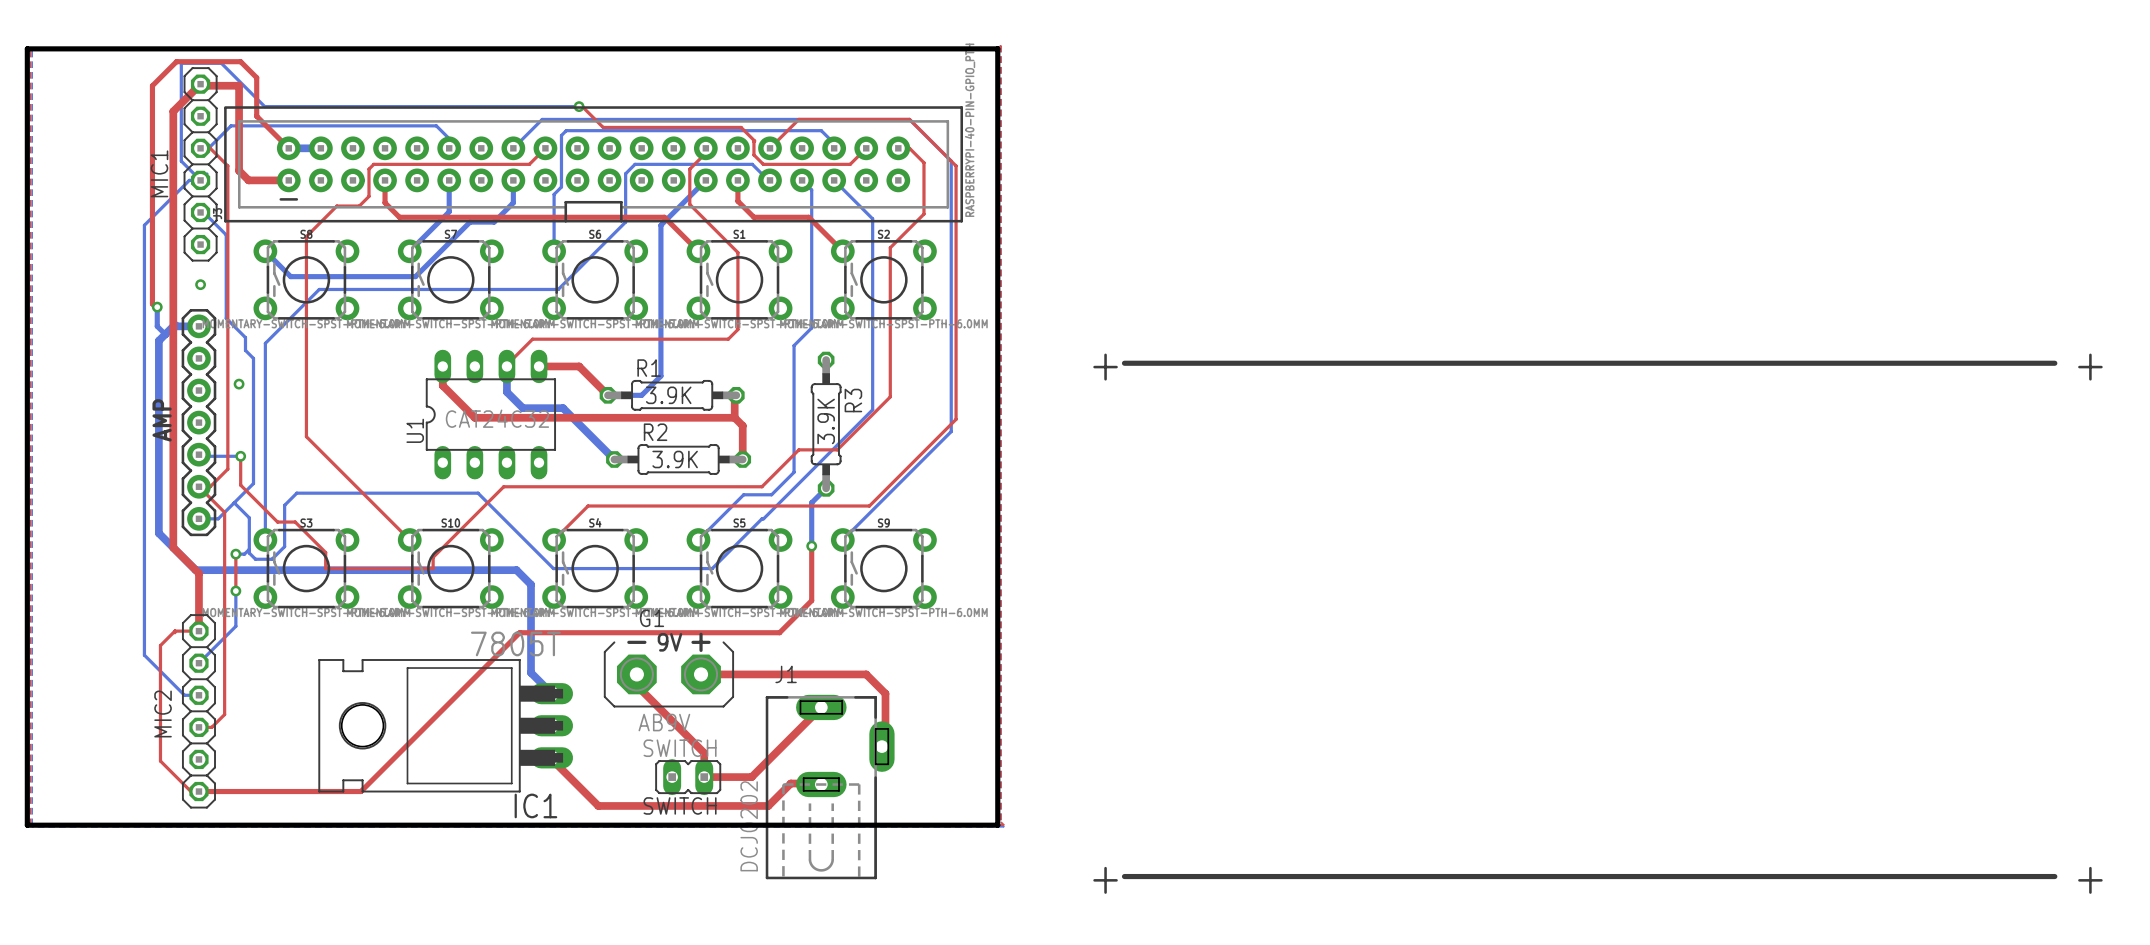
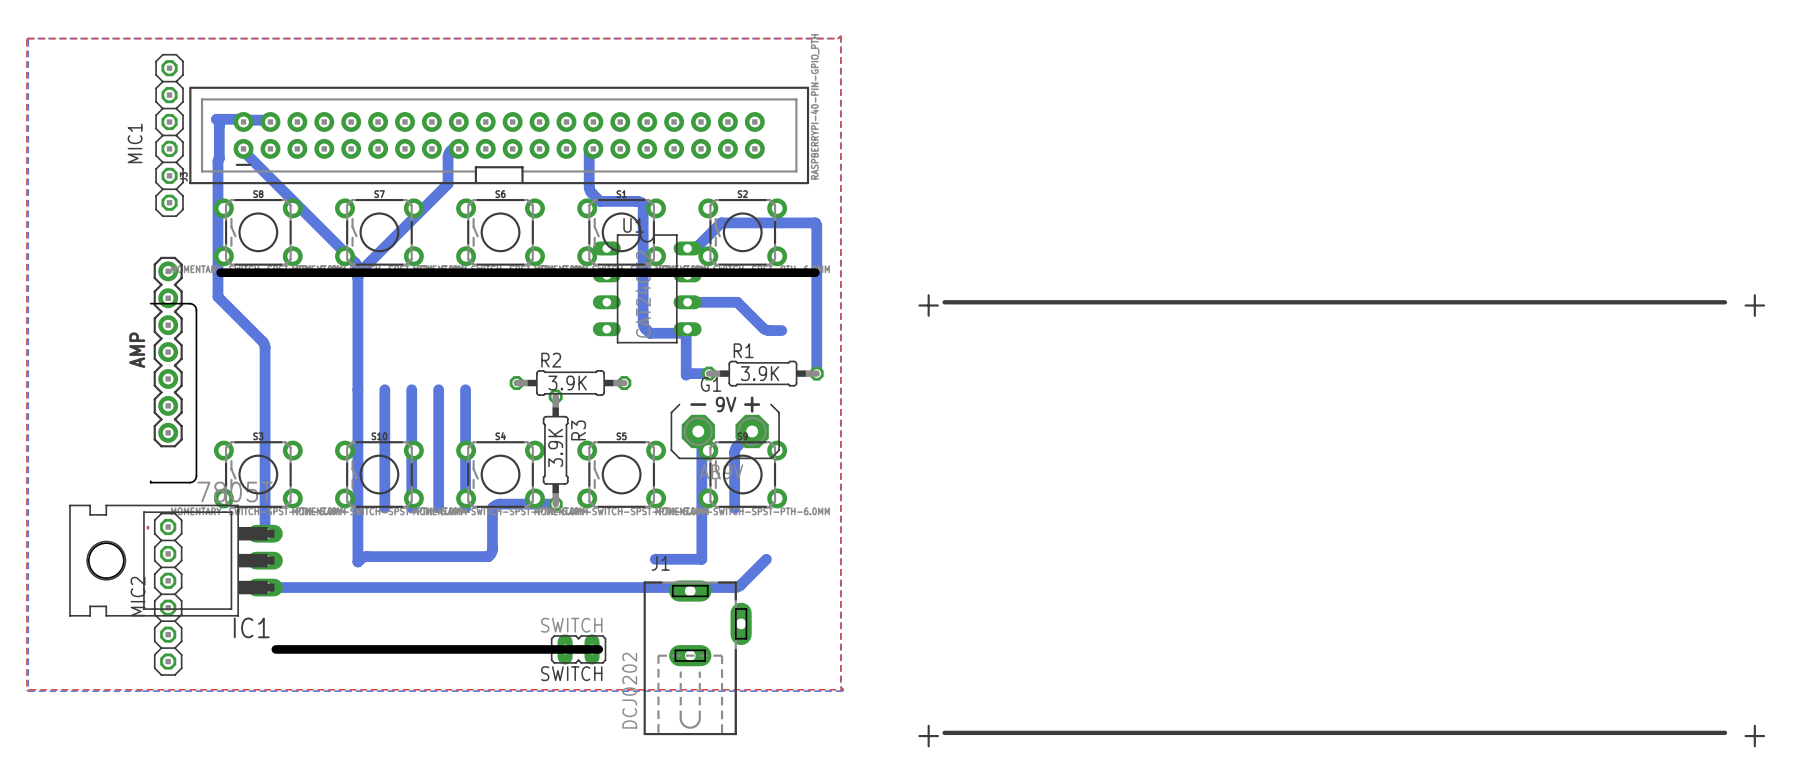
board edge: (27, 48) (997, 48) (997, 825) (27, 825) (27, 48) -> none
bottom track: (579, 106) (264, 106) (221, 63) (181, 63) (181, 161) (200, 180) (189, 180) (144, 225) (144, 655) (184, 695) (198, 695) (194, 700) -> none
top track: (579, 106) (582, 106) (603, 127) (741, 127) (754, 140) (753, 154) (763, 164) (850, 164) (866, 148) -> none
via: (579, 106) -> none
bottom track: none -> (266, 120) (216, 119) (219, 125) (217, 296) (262, 341) (265, 346) (265, 533)
bottom track: (200, 148) (208, 148) (231, 125) (436, 125) (449, 138) (449, 148) -> none
top track: (200, 148) (210, 148) (227, 165) (227, 469) (210, 486) (198, 486) (224, 512) (224, 714) (211, 727) (198, 727) -> none
top track: (288, 148) (256, 116) (256, 77) (240, 61) (176, 61) (152, 85) (152, 303) (157, 308) (157, 307) -> none
bottom track: (513, 148) (542, 119) (909, 119) (951, 161) (951, 431) (842, 540) -> none
top track: (545, 148) (529, 164) (373, 164) (368, 169) (368, 196) (359, 206) (336, 206) (306, 236) (306, 436) (409, 540) -> none
top track: (705, 148) (705, 153) (689, 169) (689, 204) (737, 252) (737, 329) (728, 339) (532, 339) (506, 366) -> none
top track: (770, 148) (798, 119) (909, 119) (956, 165) (956, 419) (869, 506) (588, 506) (554, 540) -> none
bottom track: (834, 148) (834, 143) (821, 130) (566, 130) (561, 135) (561, 187) (554, 194) (554, 251) -> none
top track: (898, 148) (909, 148) (923, 162) (923, 214) (890, 247) (890, 396) (837, 449) (798, 449) (761, 486) (503, 486) (433, 557) (433, 568) (325, 568) (325, 552) (295, 522) (277, 522) (240, 485) (240, 456) -> none
bottom track: (808, 177) (802, 180) (811, 190) (811, 327) (794, 345) (794, 472) (771, 494) (743, 494) (698, 540) -> none
bottom track: none -> (239, 147) (357, 266) (357, 561) (366, 556) (488, 556) (492, 550) (492, 508) (494, 505) (500, 504) (555, 504)
bottom track: none -> (454, 147) (448, 156) (448, 183) (360, 271) (357, 277)
bottom track: none -> (589, 147) (589, 186) (591, 193) (600, 201) (636, 201) (643, 204) (644, 327) (649, 333) (686, 332)
top track: (288, 180) (248, 180) (239, 170) (239, 85) (202, 85) (200, 84) (173, 111) (173, 547) (198, 573) (198, 631) (174, 631) (160, 645) (160, 761) (190, 791) (360, 791) (519, 632) (779, 632) (811, 600) (811, 546) -> none
top track: (385, 180) (385, 202) (399, 217) (664, 217) (698, 251) -> none
bottom track: (449, 180) (449, 211) (409, 251) -> none
bottom track: (513, 180) (513, 202) (494, 222) (470, 222) (415, 276) (290, 276) (265, 251) -> none
bottom track: (705, 180) (660, 225) (660, 376) (641, 395) (607, 395) -> none
top track: (737, 180) (737, 201) (753, 217) (808, 217) (842, 251) -> none
bottom track: (770, 180) (752, 164) (635, 164) (625, 173) (625, 222) (558, 289) (319, 289) (265, 343) (265, 540) -> none
bottom track: (834, 180) (872, 218) (872, 409) (712, 568) (553, 568) (478, 493) (296, 493) (284, 505) (284, 546) (272, 559) (255, 559) (249, 553) (249, 517) (234, 502) -> none
bottom track: (200, 212) (203, 212) (226, 234) (226, 318) (245, 337) (245, 350) (253, 358) (253, 483) (218, 518) (198, 518) -> none
via: (200, 284) -> none
bottom track: none -> (687, 248) (697, 246) (721, 222) (815, 222) (816, 373)
bottom track: (157, 307) (157, 326) (165, 334) -> none
via: (157, 307) -> none
bottom track: (198, 326) (174, 324) (158, 340) (158, 533) (195, 570) (516, 570) (531, 584) (531, 672) (551, 693) -> none
board edge: none -> (220, 272) (815, 272)
bottom track: none -> (687, 302) (737, 302) (764, 329) (781, 330)
board edge: none -> (150, 303) (190, 303) (195, 306) (196, 310) (196, 477) (190, 482) (150, 481)
top track: (442, 366) (442, 385) (474, 417) (734, 417) -> none
bottom track: (506, 366) (506, 392) (522, 408) (563, 408) (614, 459) -> none
top track: (539, 366) (579, 366) (607, 395) -> none
via: (239, 384) -> none
R1 position: (672, 395) -> (762, 373)
top track: (736, 395) (734, 417) -> none
bottom track: none -> (686, 332) (686, 374) (709, 373)
U1 rotation: 0° (490, 414) -> 90° clockwise (647, 288)
U1 position: (490, 414) -> (647, 288)
top track: (734, 417) (742, 425) (742, 459) -> none
R3 position: (826, 424) -> (555, 450)
bottom track: (198, 454) (200, 456) (240, 456) -> none
via: (240, 456) -> none
bottom track: none -> (384, 389) (384, 508)
bottom track: none -> (411, 389) (411, 508)
bottom track: none -> (438, 389) (438, 508)
bottom track: none -> (465, 389) (465, 508)
bottom track: (827, 480) (826, 488) (811, 502) (811, 546) -> none
bottom track: none -> (698, 431) (701, 438) (701, 559) (655, 559)
bottom track: none -> (752, 431) (734, 450) (734, 508)
via: (811, 546) -> none
bottom track: (249, 549) (244, 554) (235, 554) -> none
top track: (235, 554) (235, 591) -> none
via: (235, 554) -> none
bottom track: (235, 591) (235, 626) (198, 663) -> none
via: (235, 591) -> none
bottom track: none -> (766, 559) (740, 585) (734, 587) (265, 587)
G1 position: (668, 670) -> (725, 427)
top track: (636, 674) (636, 685) (704, 753) (704, 777) (751, 777) (821, 707) -> none
top track: (701, 674) (866, 674) (885, 693) (885, 743) (881, 746) -> none
IC1 position: (445, 725) -> (175, 560)
top track: (551, 757) (598, 805) (768, 805) (790, 783) (821, 784) -> none
board edge: none -> (275, 649) (598, 649)

